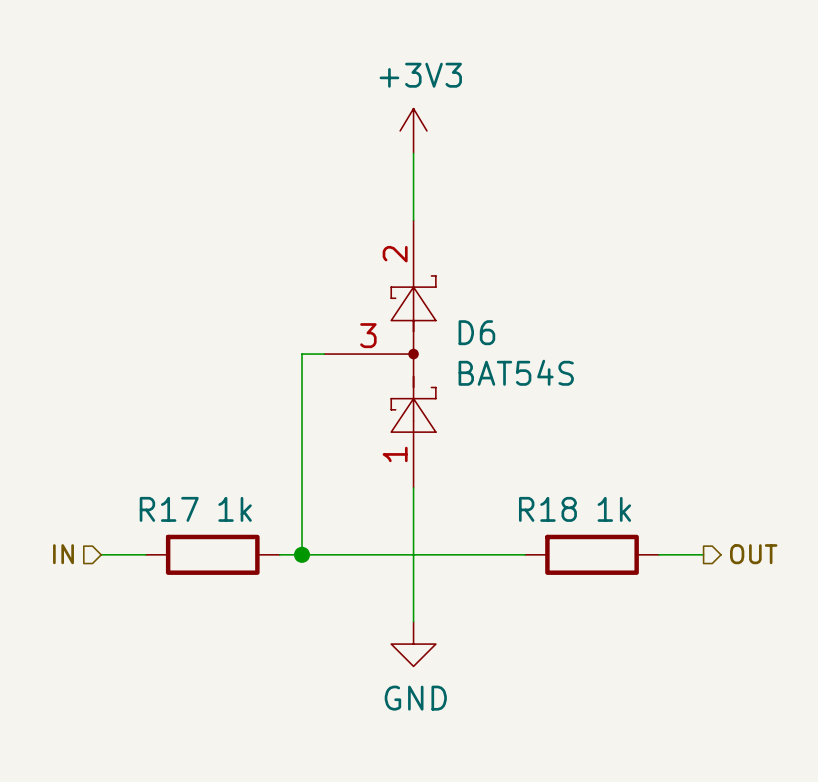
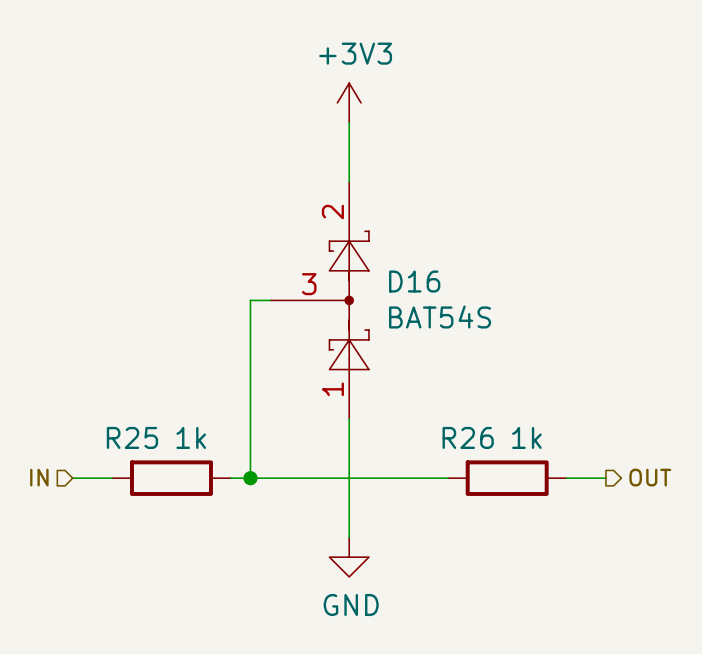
D6 name: D6 (476, 332) -> D16 (414, 281)
R17 name: R17 (169, 509) -> R25 (132, 437)
R18 name: R18 (547, 509) -> R26 (468, 437)

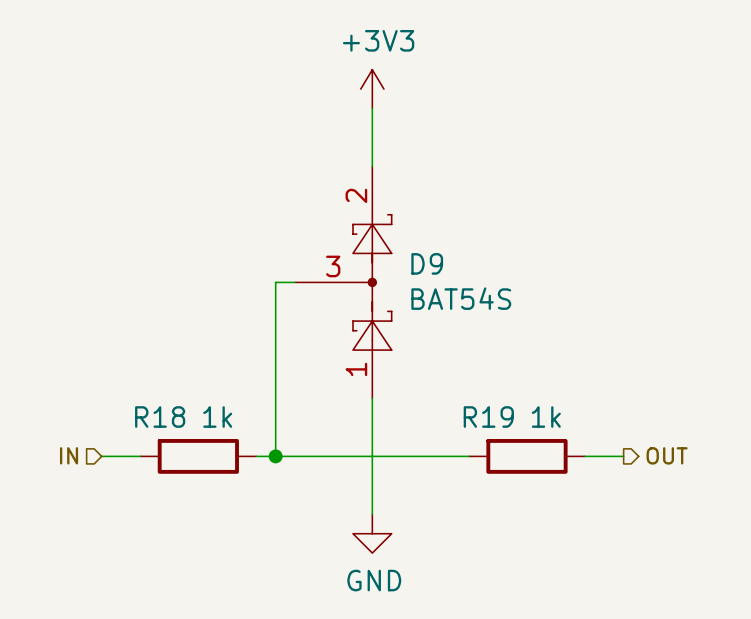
D16 name: D16 (414, 281) -> D9 (427, 263)
R25 name: R25 (132, 437) -> R18 (160, 417)
R26 name: R26 (468, 437) -> R19 (488, 417)

